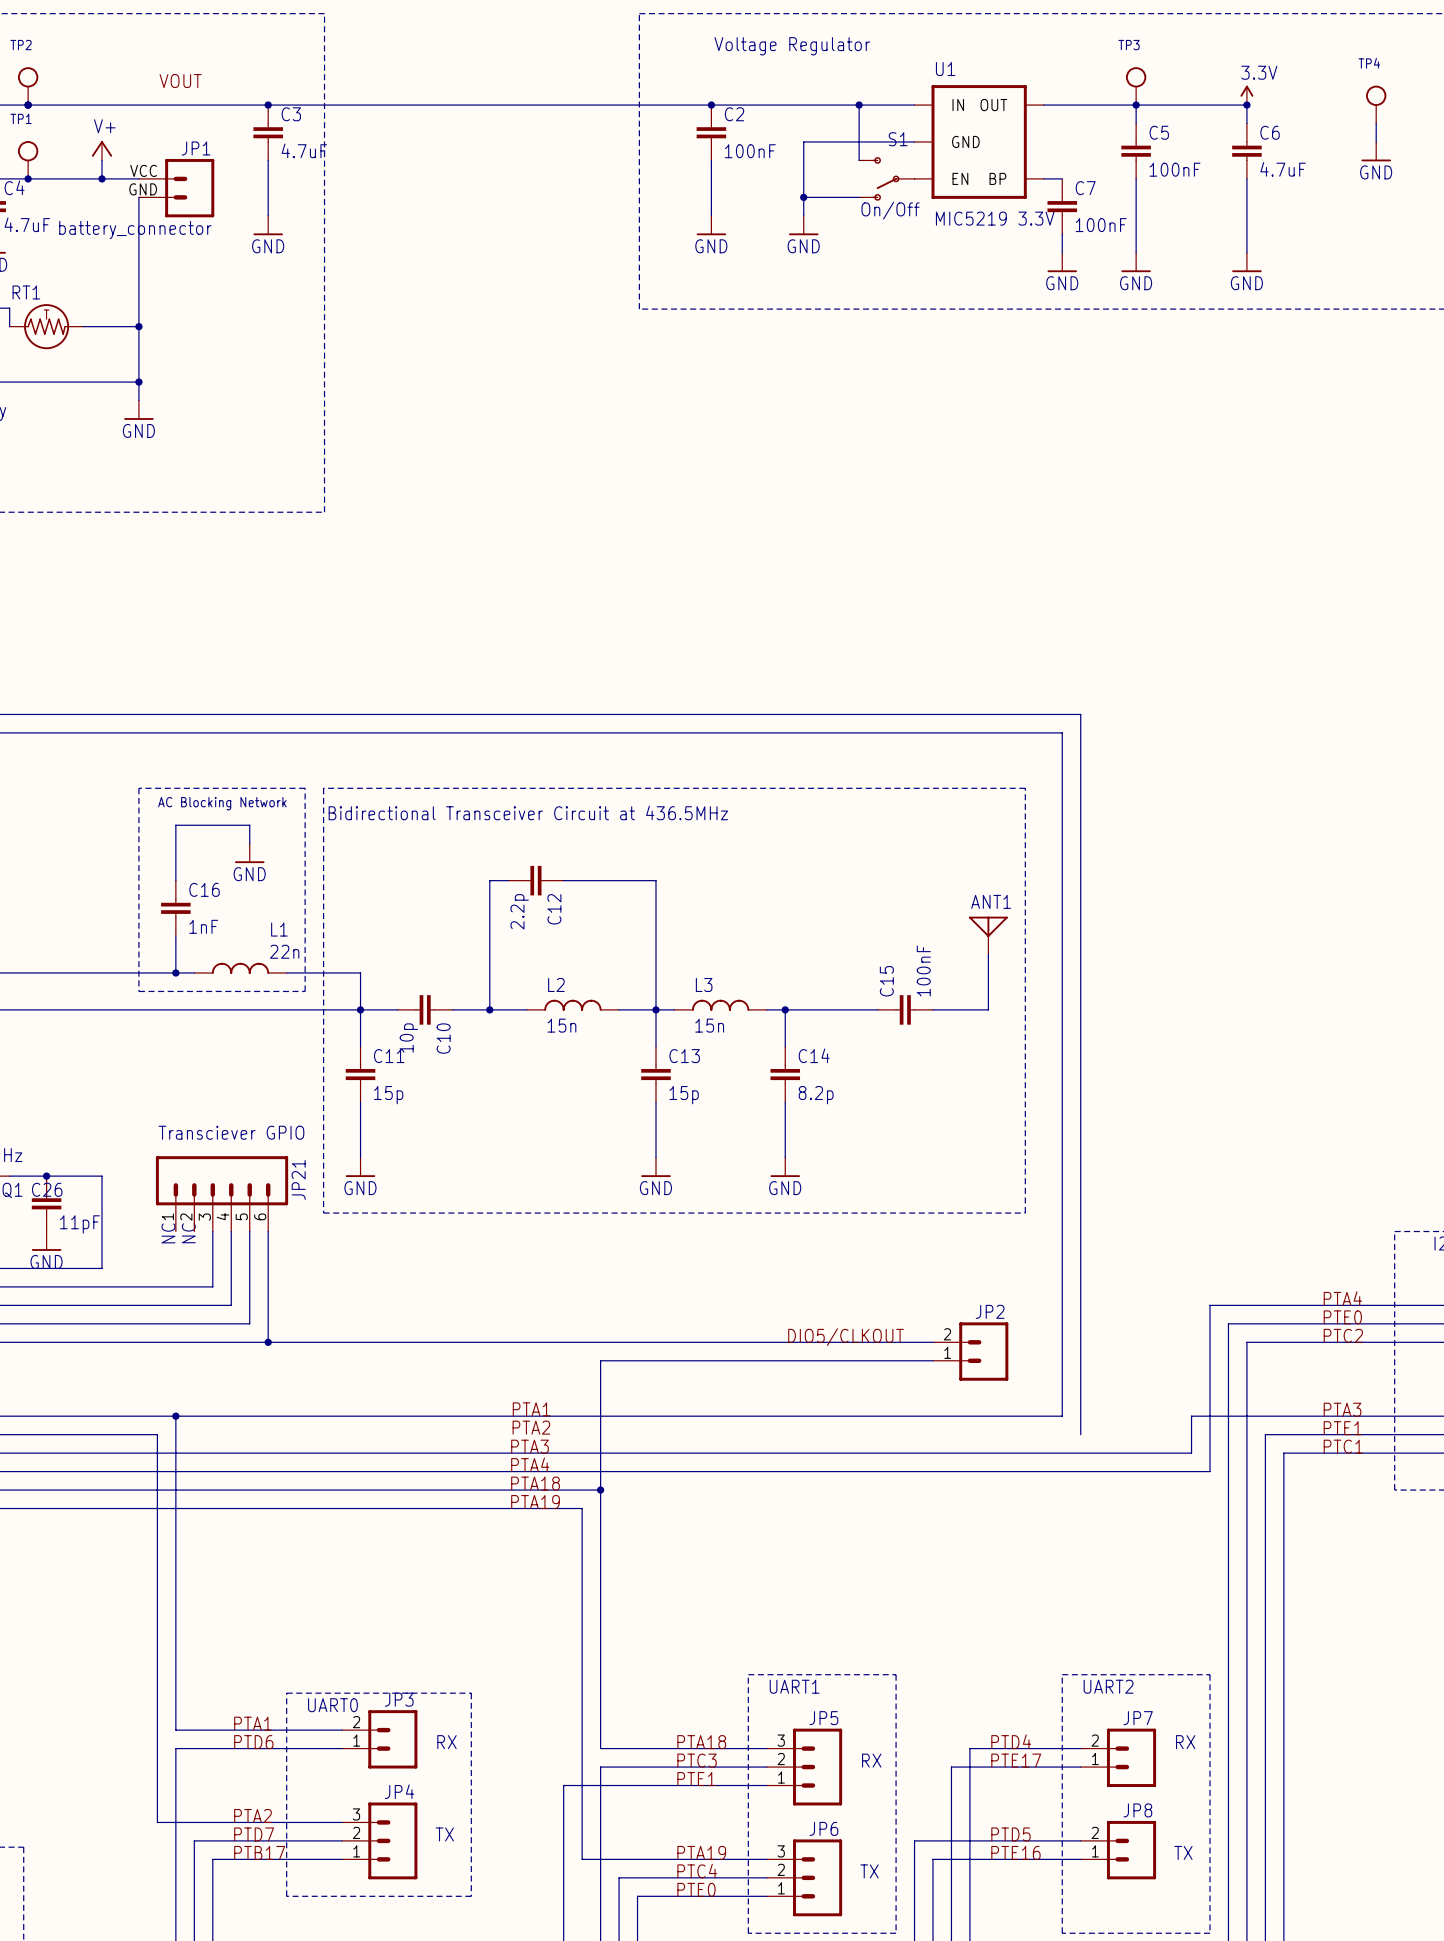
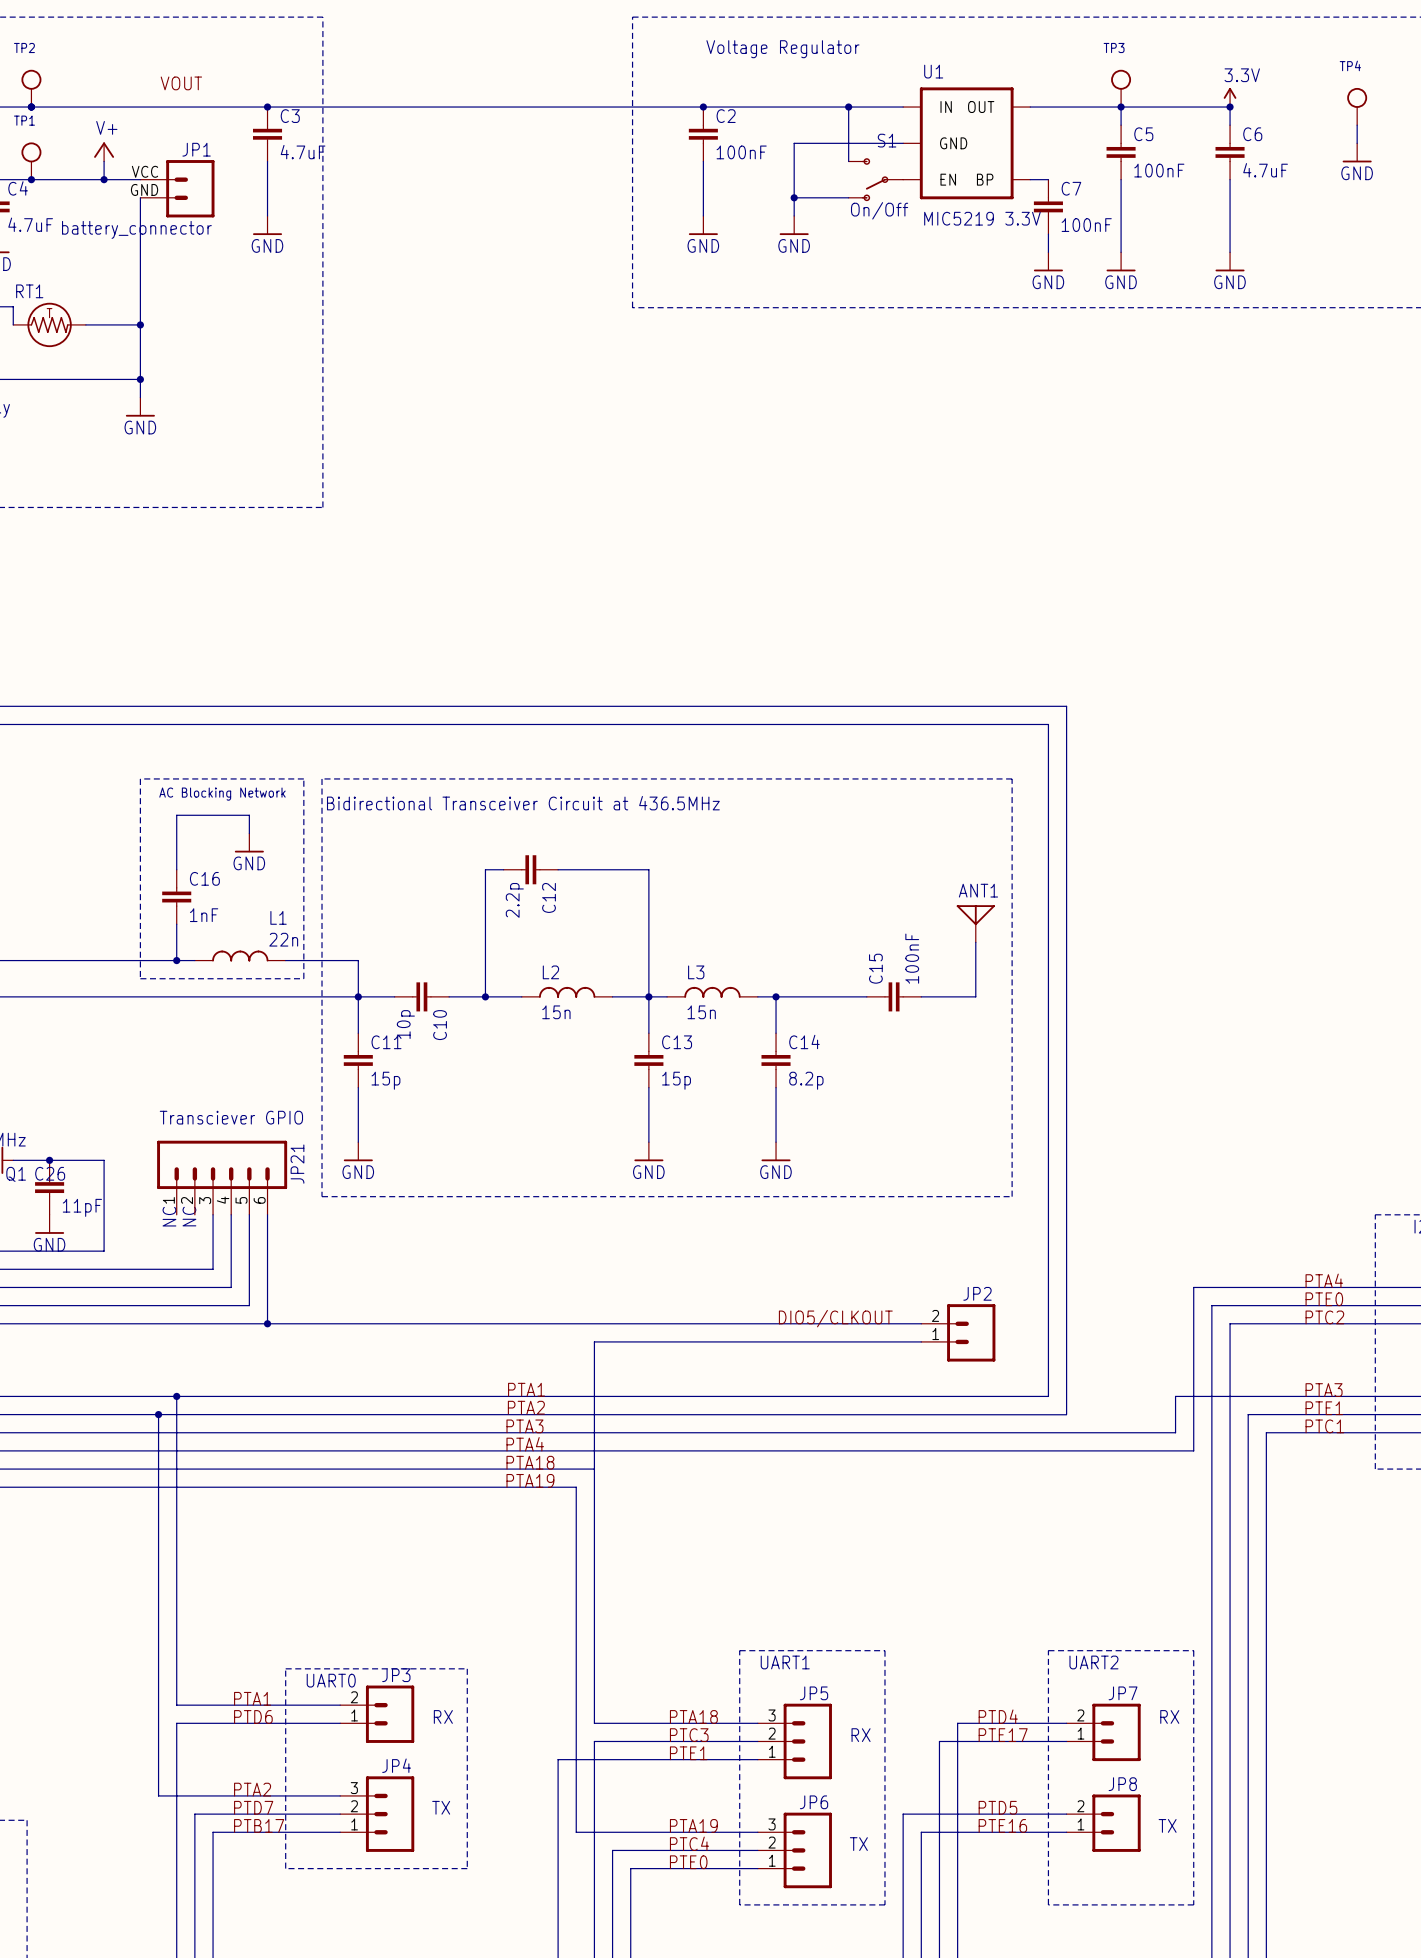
wire: none -> (158, 1414) (1066, 1414)
junction: none -> (158, 1414)
junction: (600, 1490) -> none

